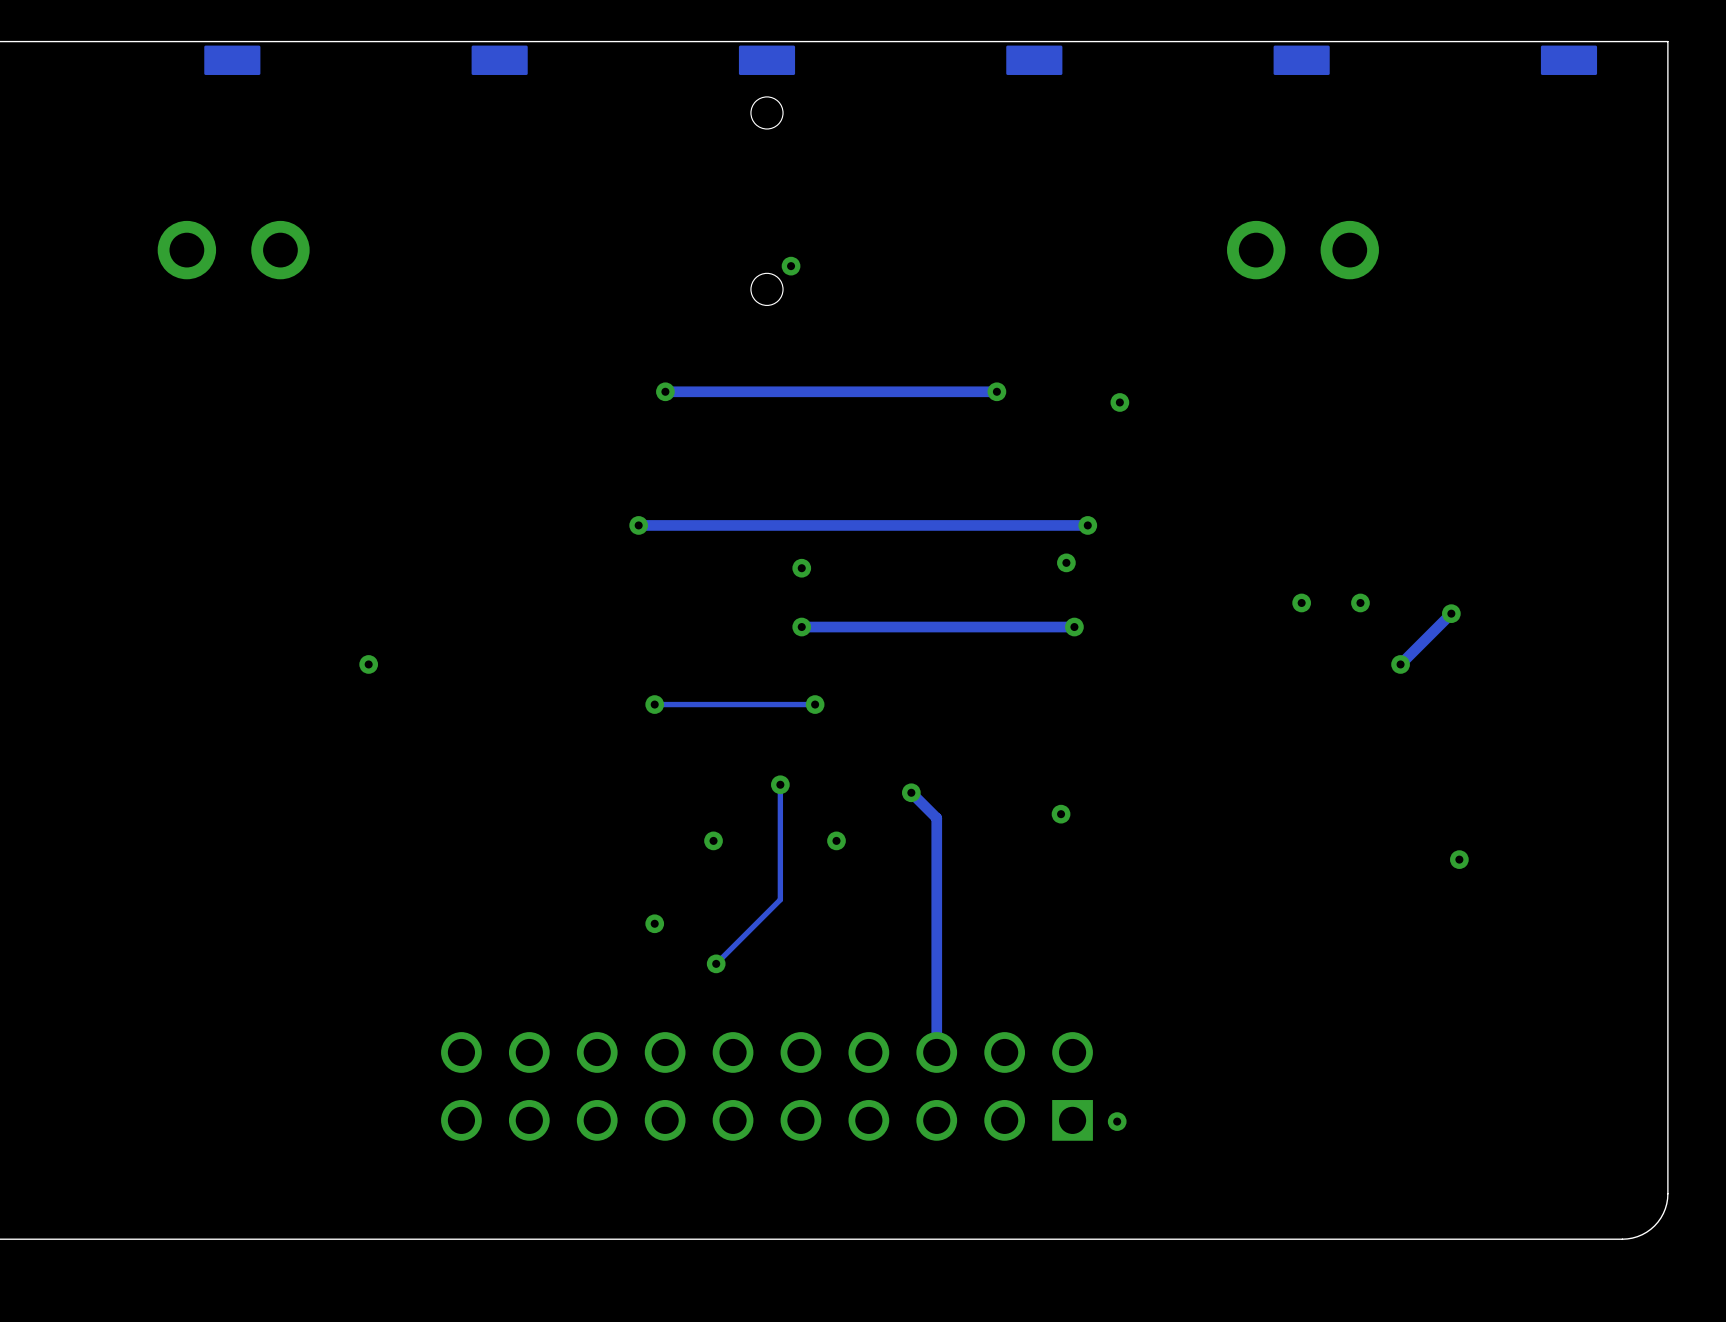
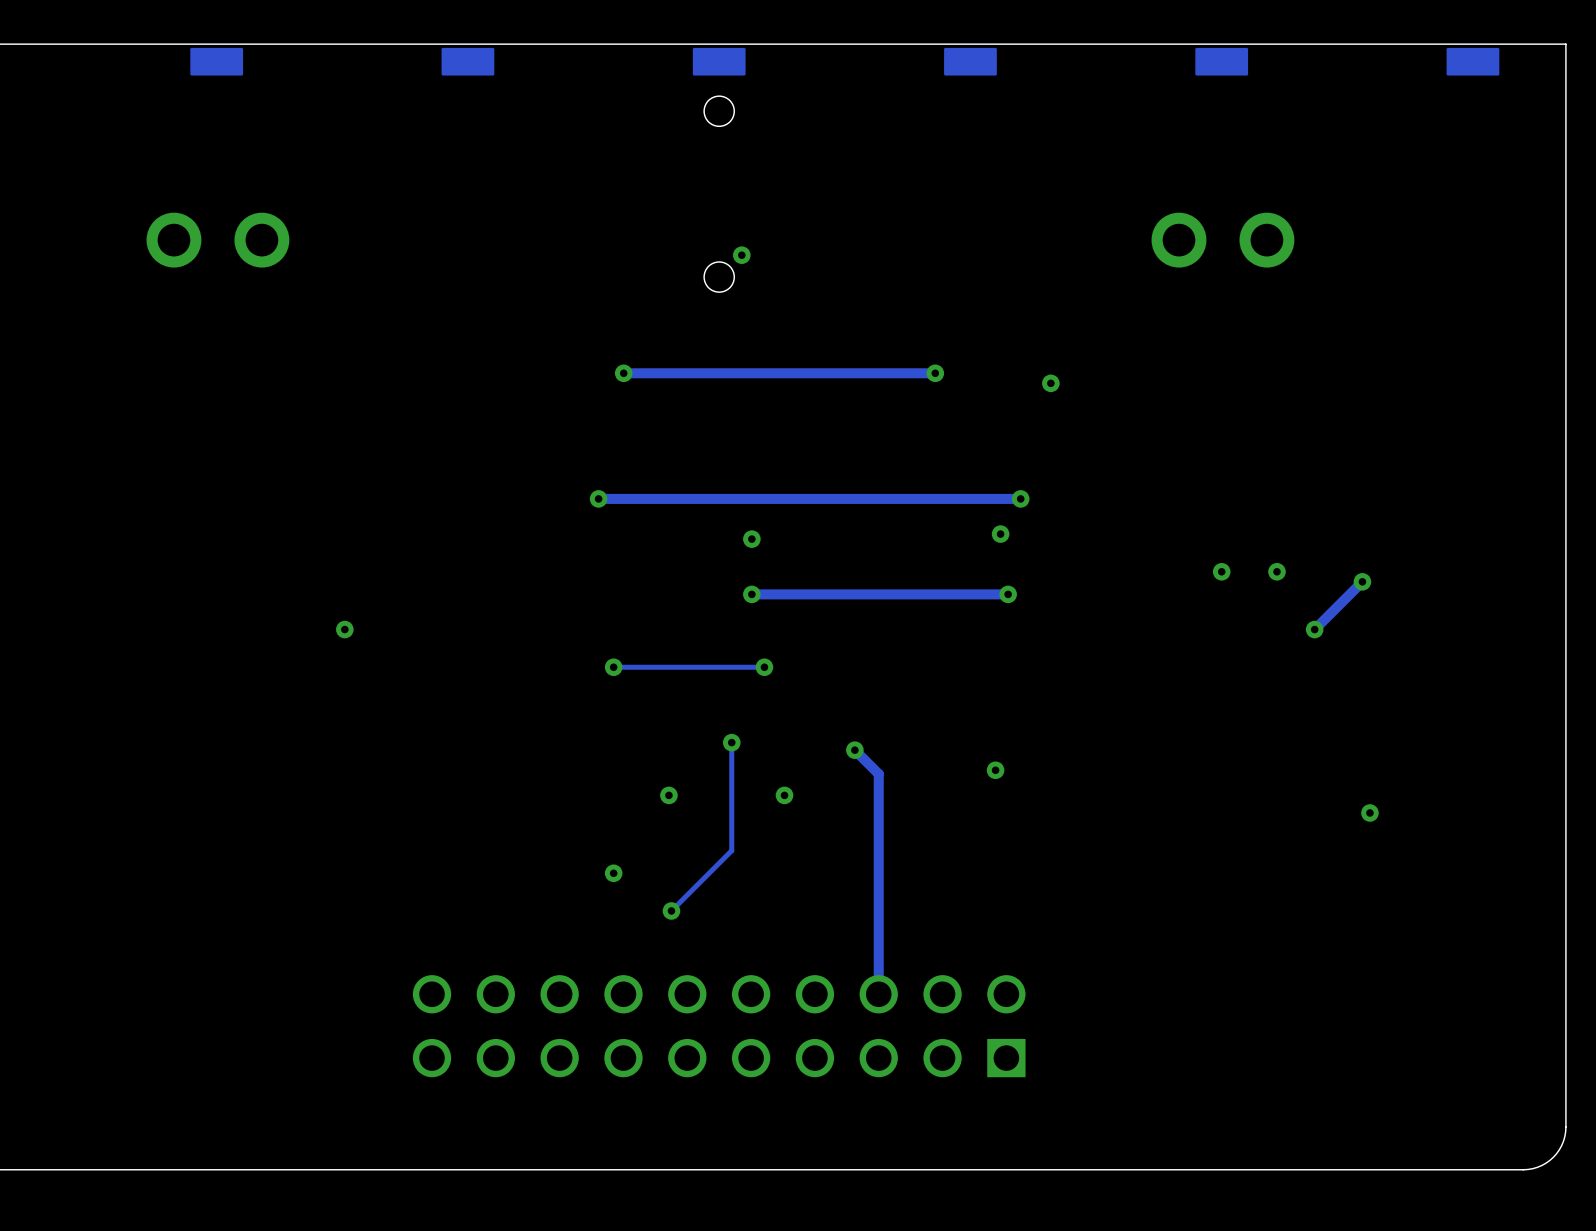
via: (1117, 1121) -> none

